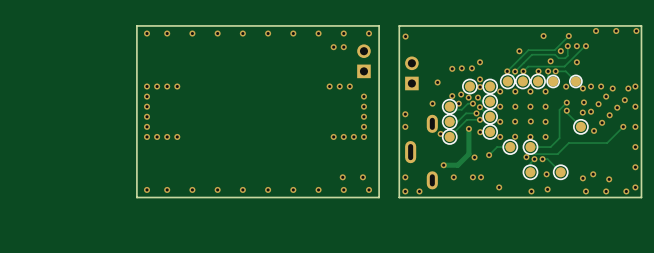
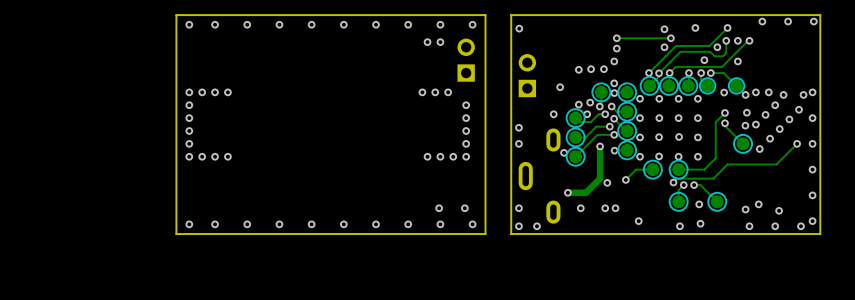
via: none -> (664, 29)
via: none -> (616, 38)
track: none -> (670, 38) (616, 38)
via: none -> (670, 38)
via: none -> (616, 48)

